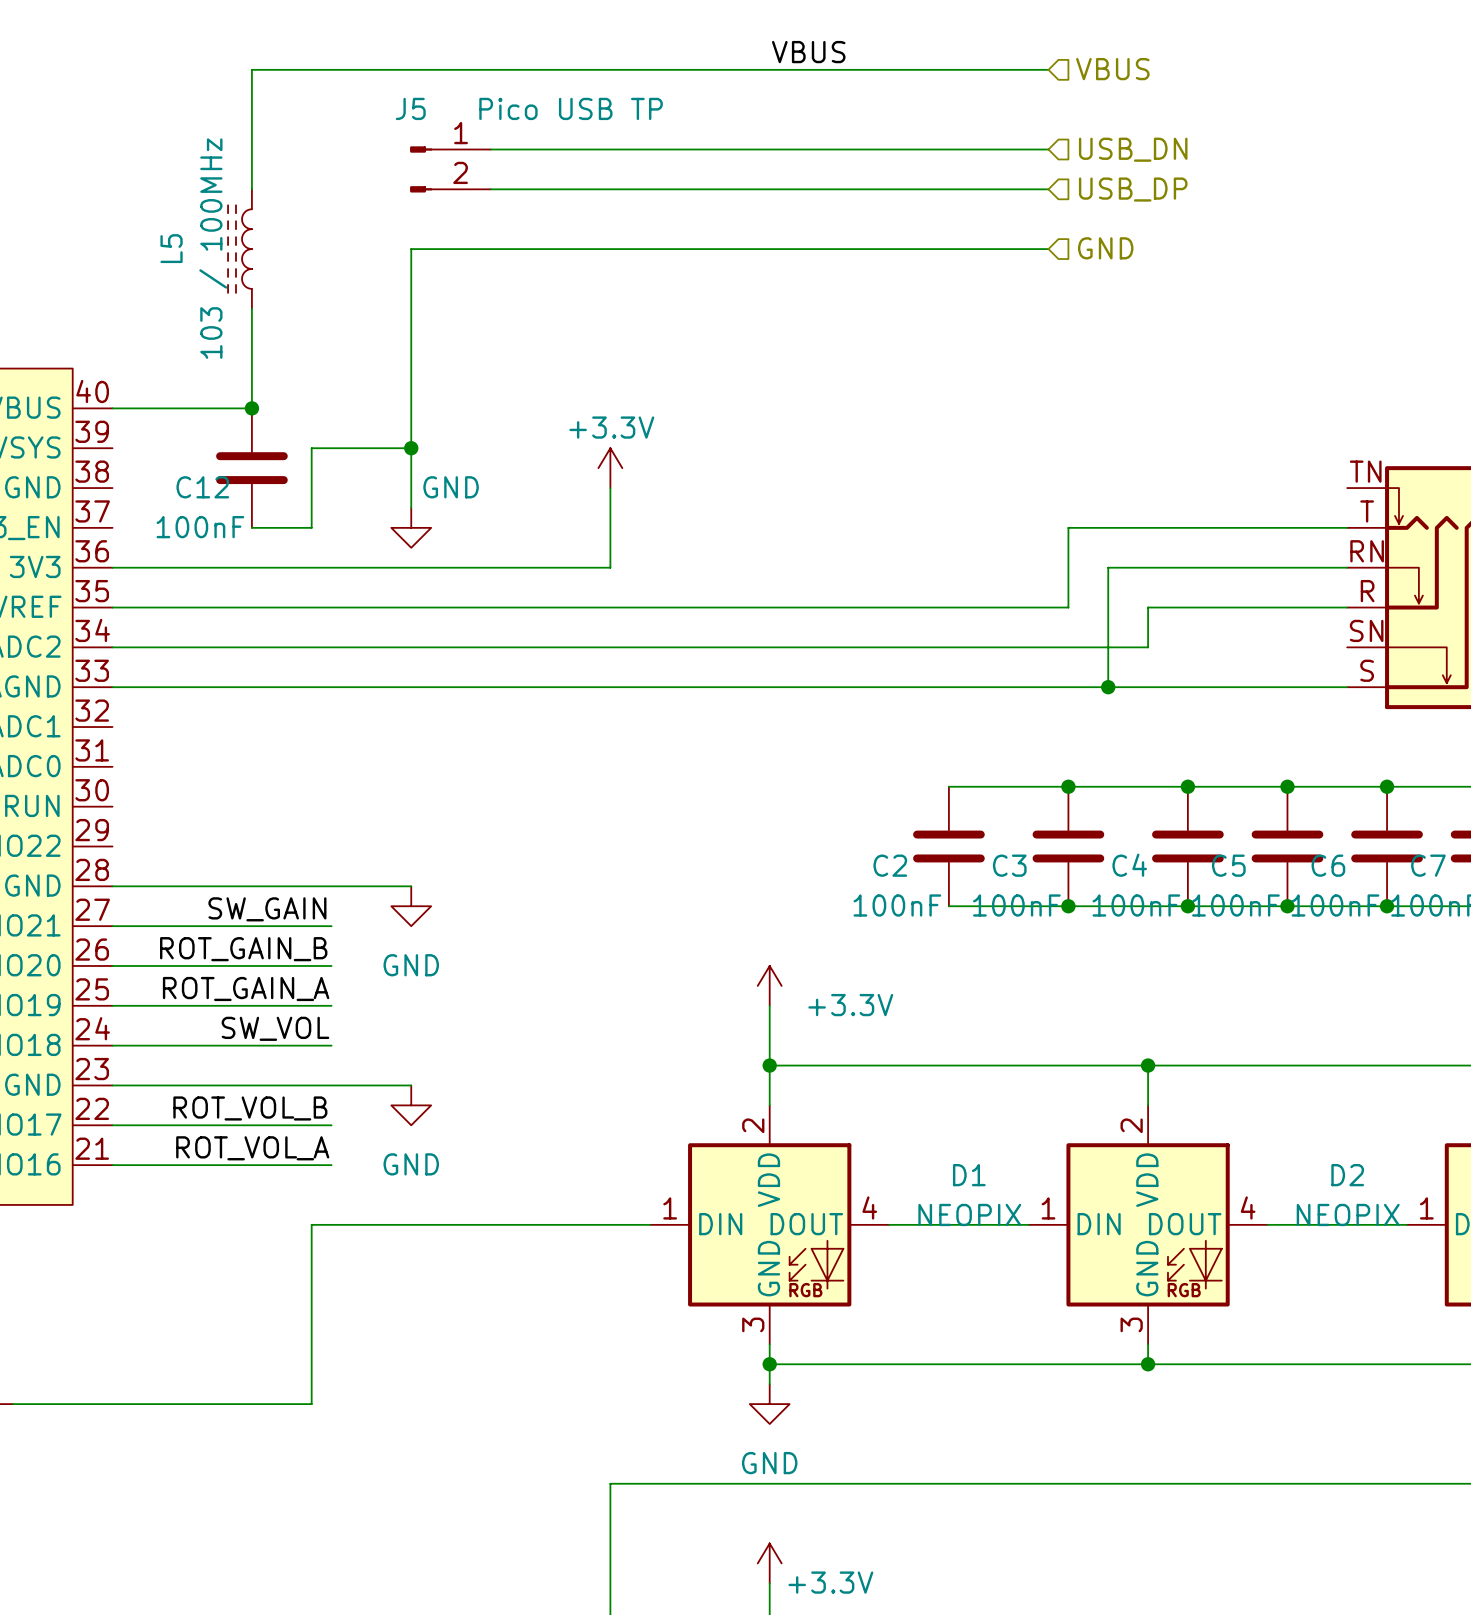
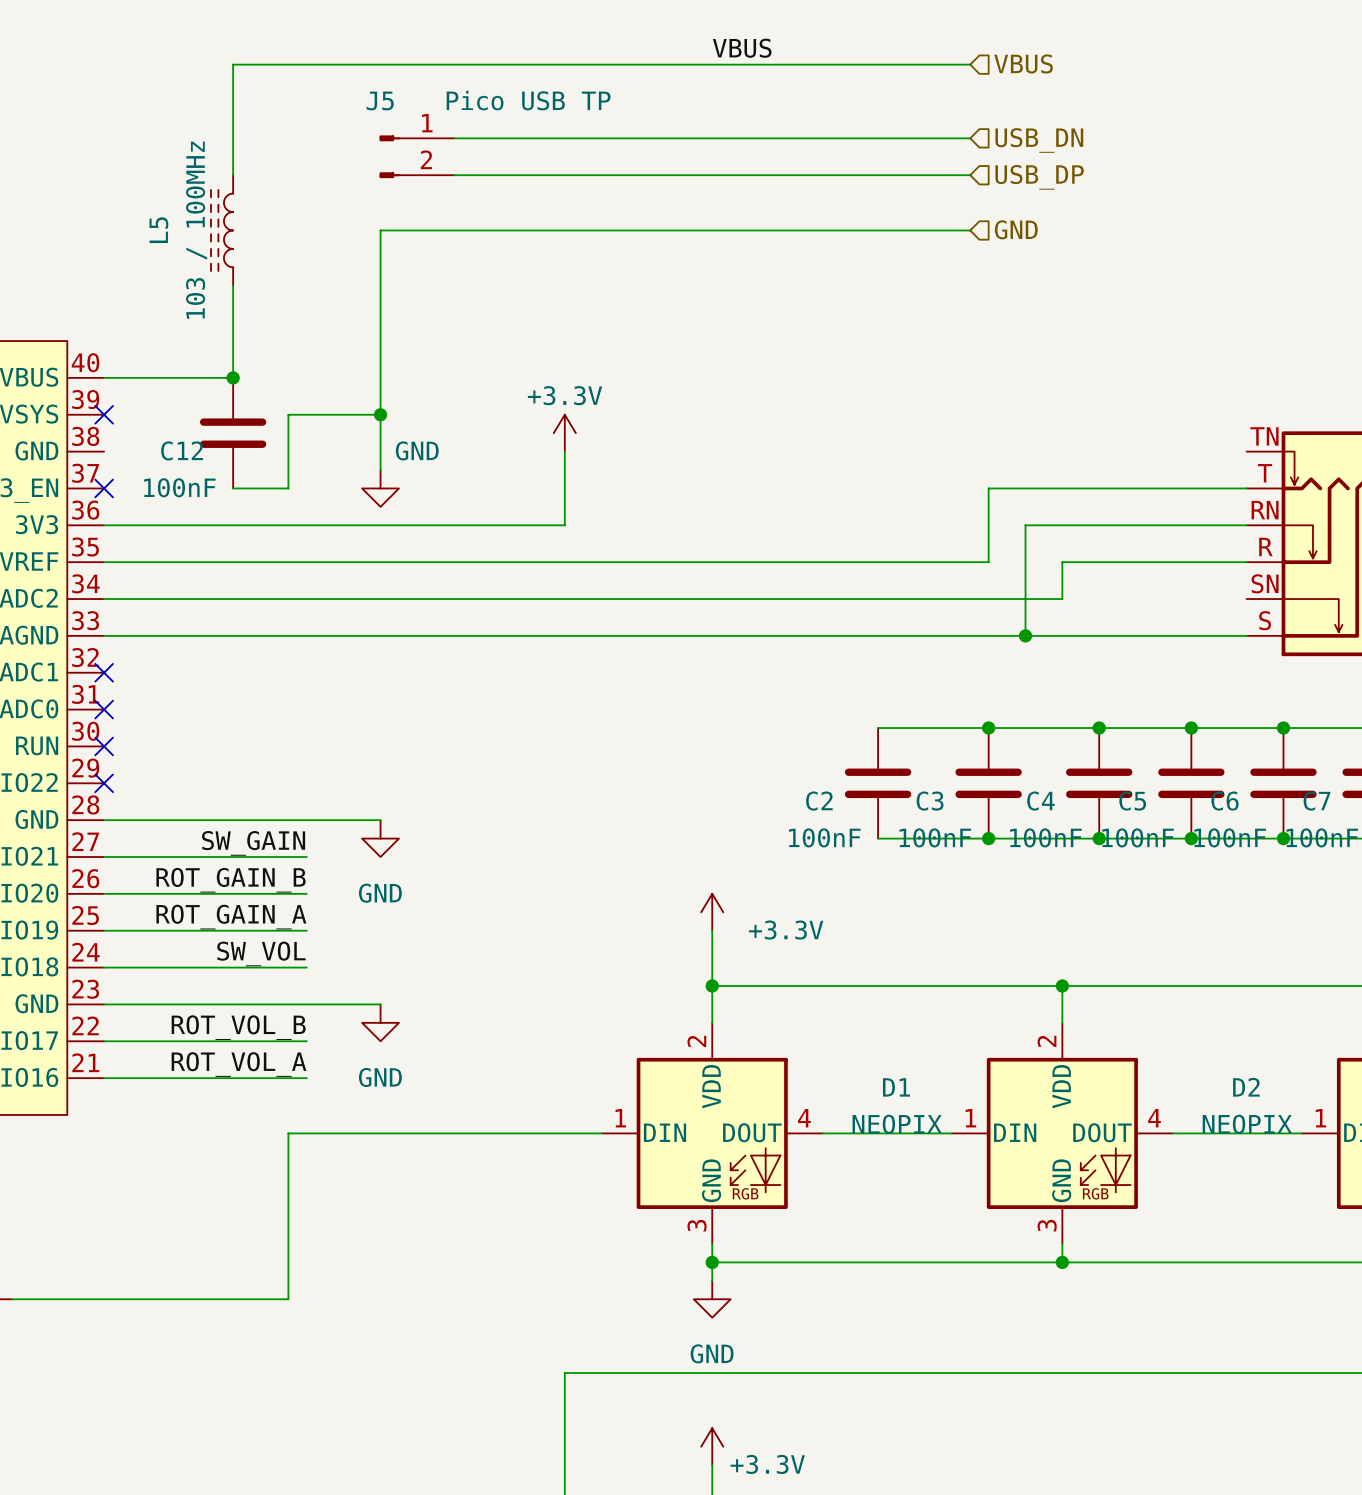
no-connect mark: none -> (104, 414)
no-connect mark: none -> (104, 488)
no-connect mark: none -> (104, 672)
no-connect mark: none -> (104, 709)
no-connect mark: none -> (104, 746)
no-connect mark: none -> (104, 783)

